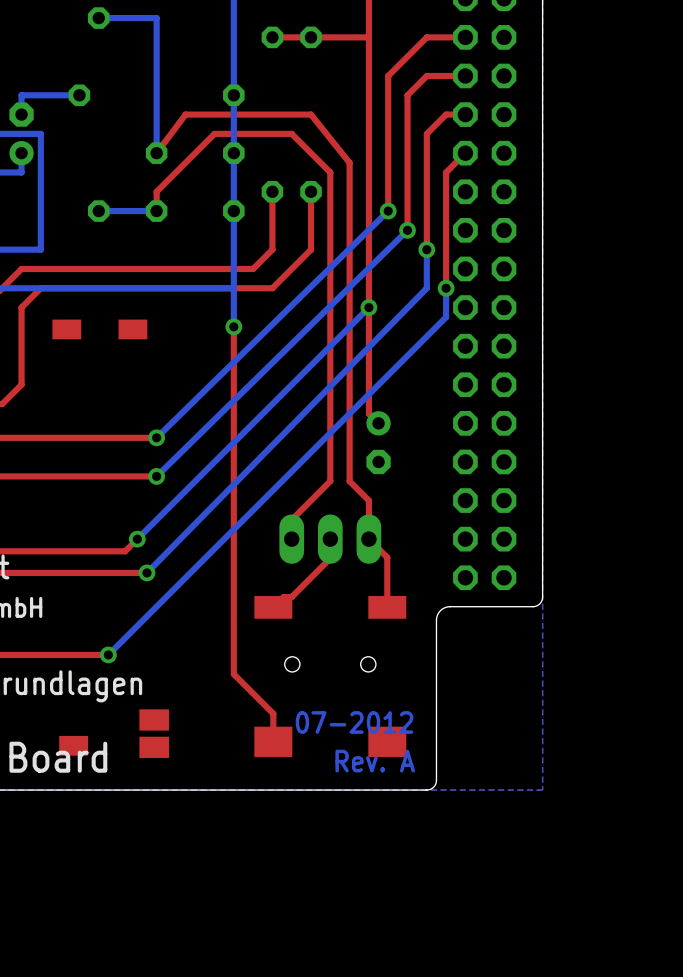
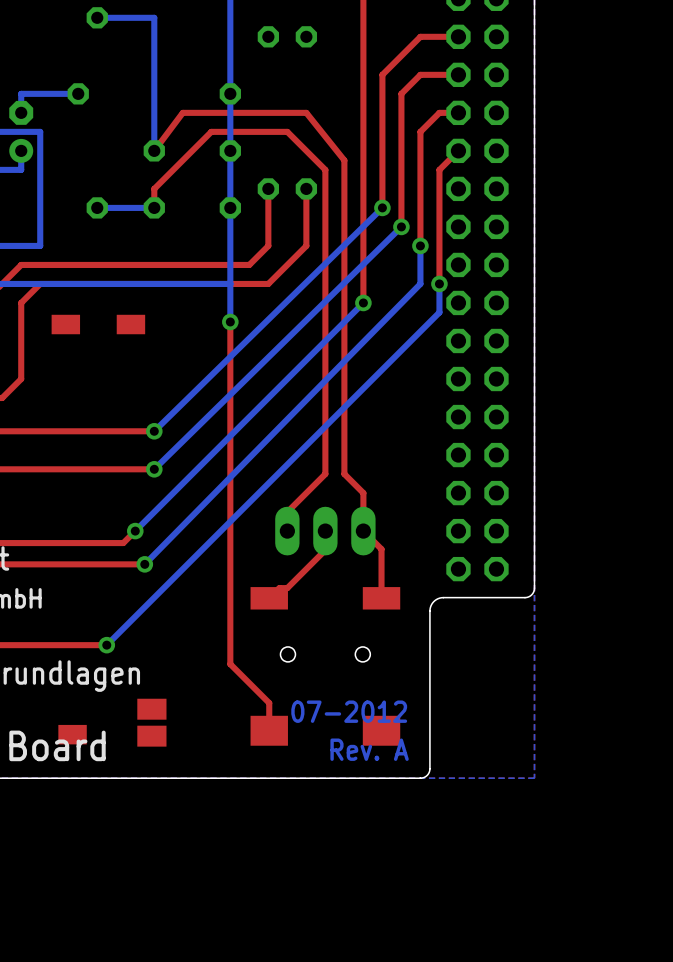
top track: (368, 37) (272, 37) -> none
top track: (368, 307) (368, 413) (378, 423) -> none
part: (378, 442) -> none

